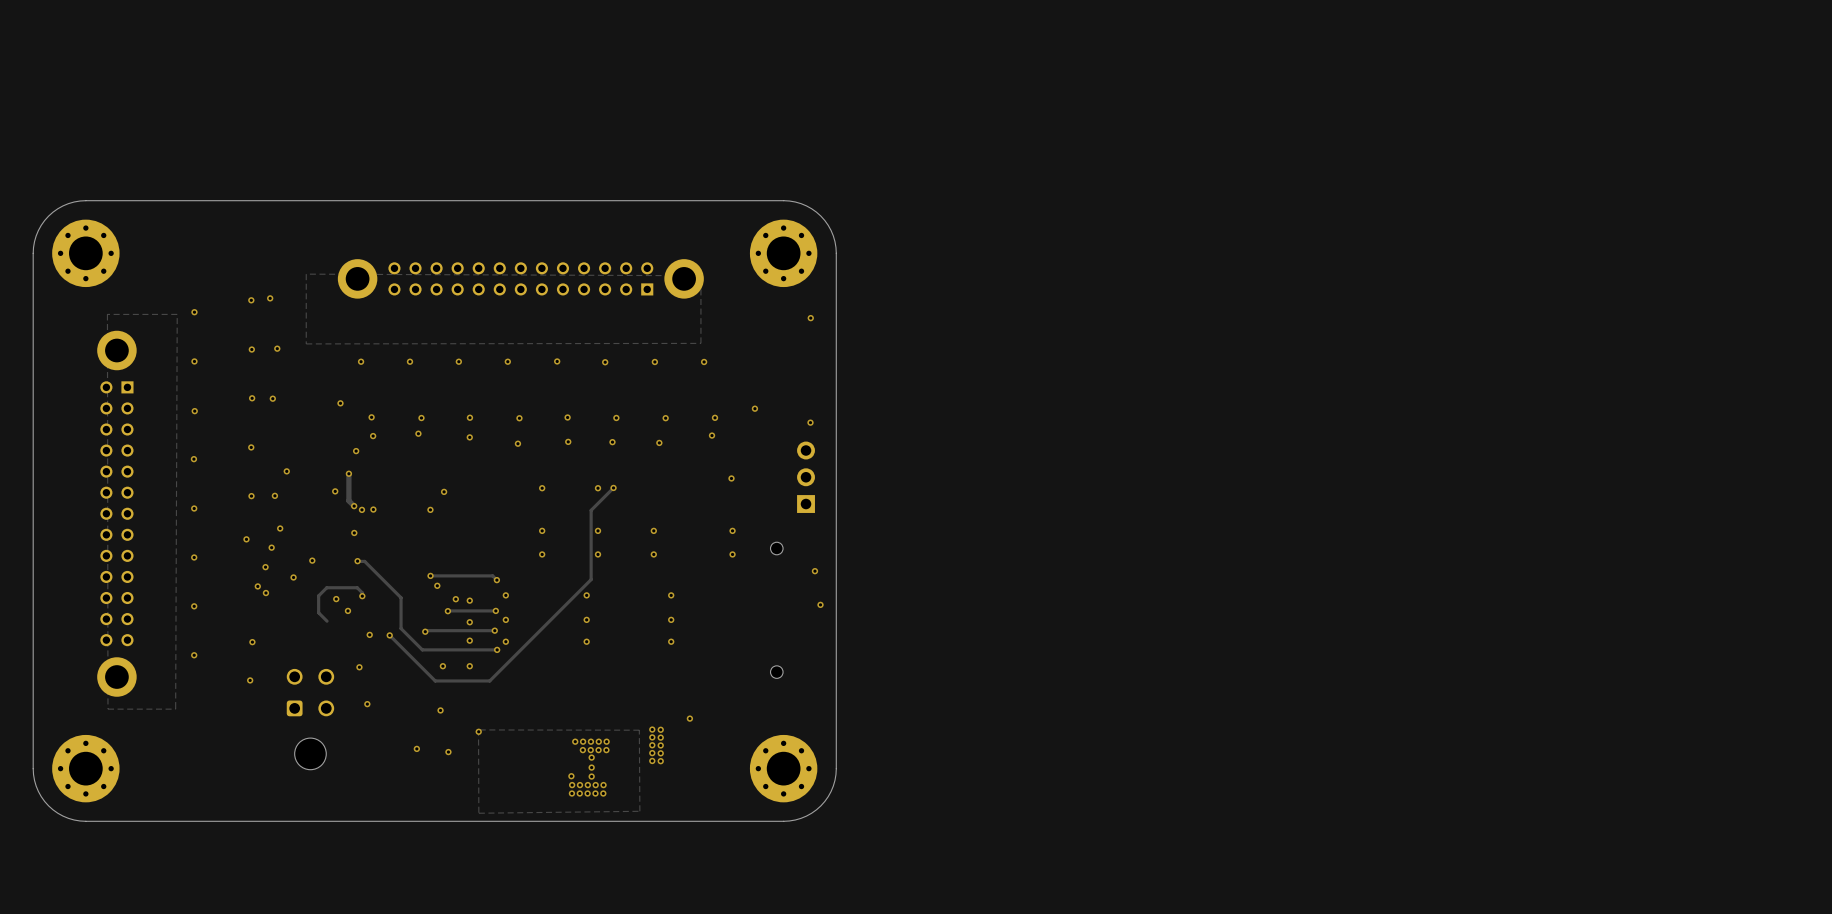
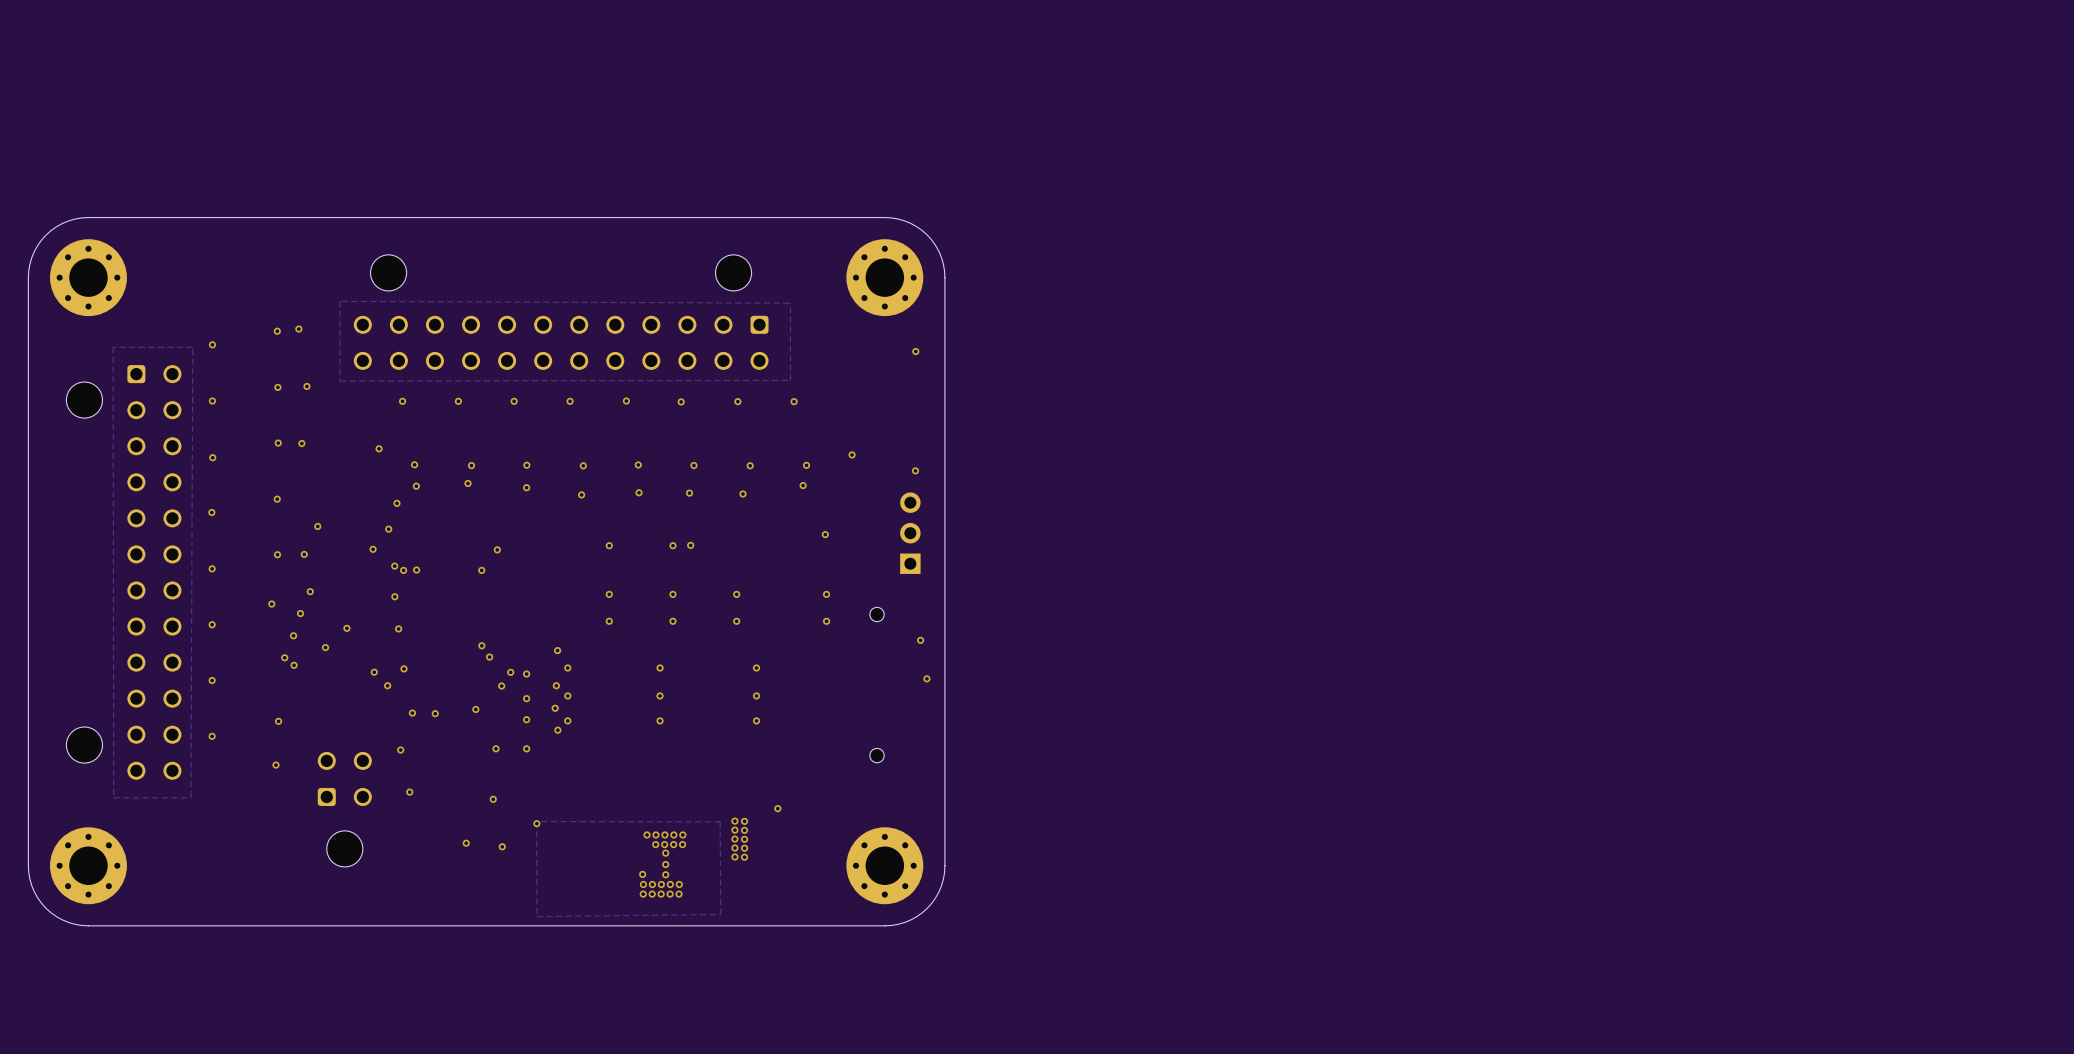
part: (520, 278) -> none
part: none -> (561, 312)
part footprint: [97, 330, 137, 697] -> [66, 365, 182, 780]
track: (348, 473) (348, 500) (354, 506) -> none
track: (613, 487) (591, 510) (591, 579) (489, 680) (435, 680) (389, 635) -> none
track: (357, 561) (364, 561) (401, 597) (401, 628) (422, 649) (497, 649) -> none
track: (430, 575) (492, 575) (496, 580) -> none
track: (362, 596) (362, 592) (357, 587) (326, 587) (318, 595) (318, 612) (327, 621) -> none
track: (495, 610) (447, 611) -> none
track: (494, 630) (425, 631) -> none

